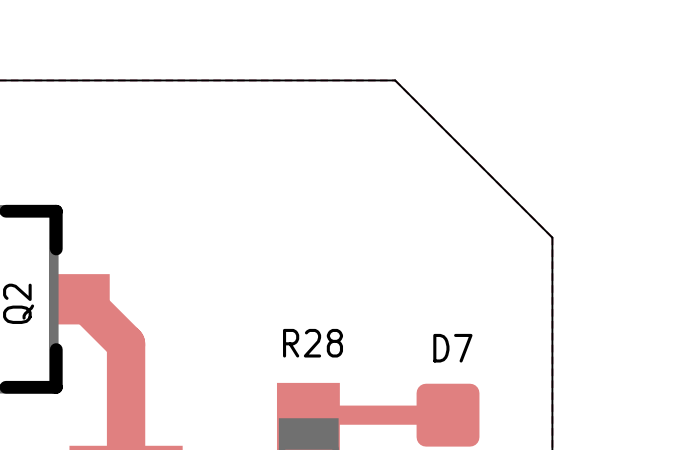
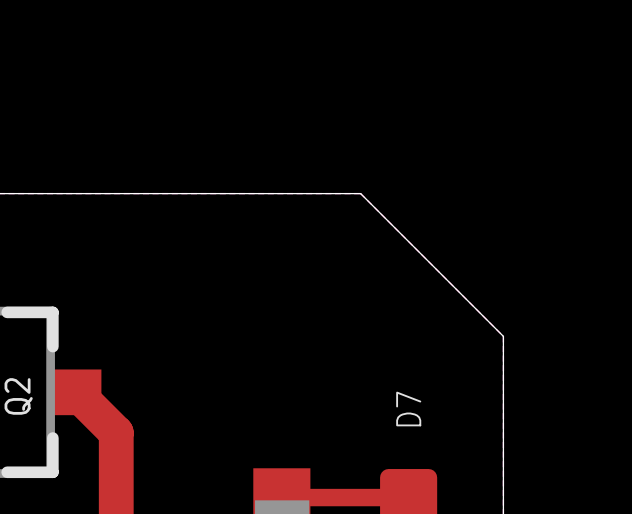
R28 name: R28 (313, 343) -> none
D7 name rotation: 0° (452, 348) -> 90° counterclockwise (408, 408)

